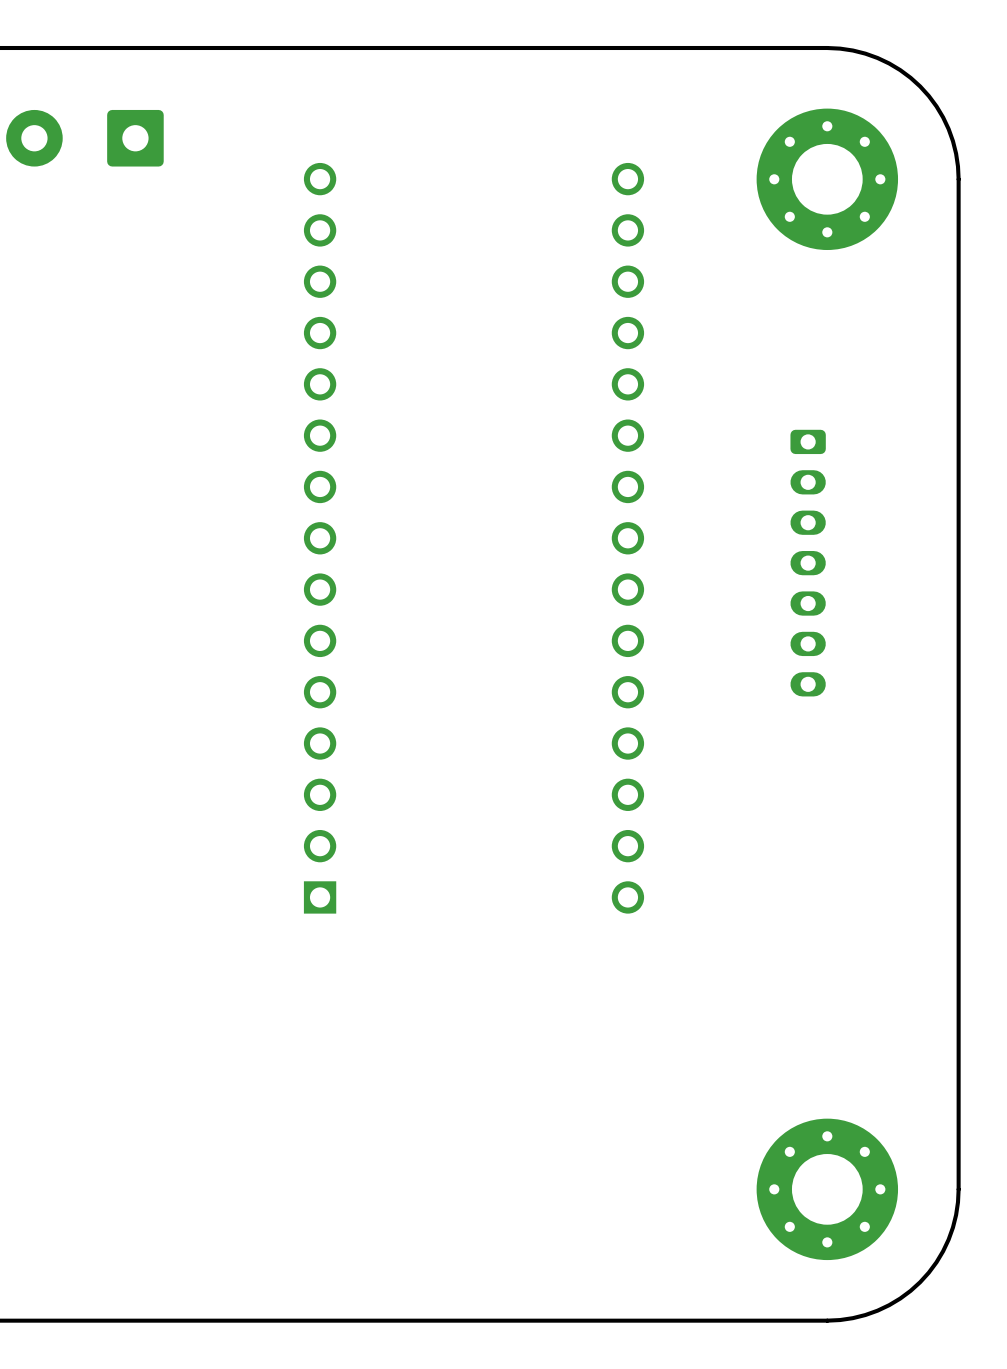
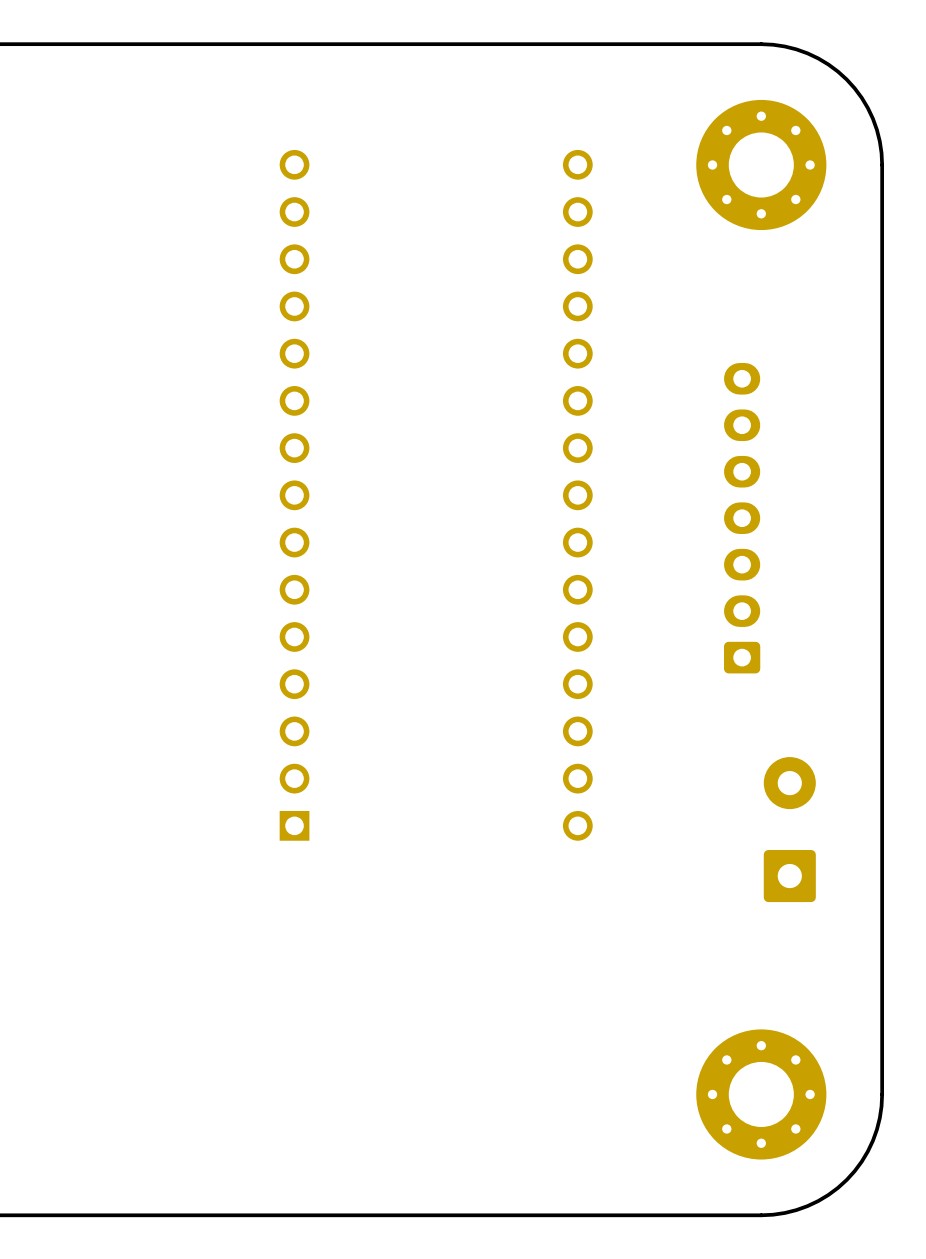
part: (84, 138) -> none
part footprint: [790, 429, 826, 697] -> [723, 362, 761, 674]
part: none -> (789, 829)

